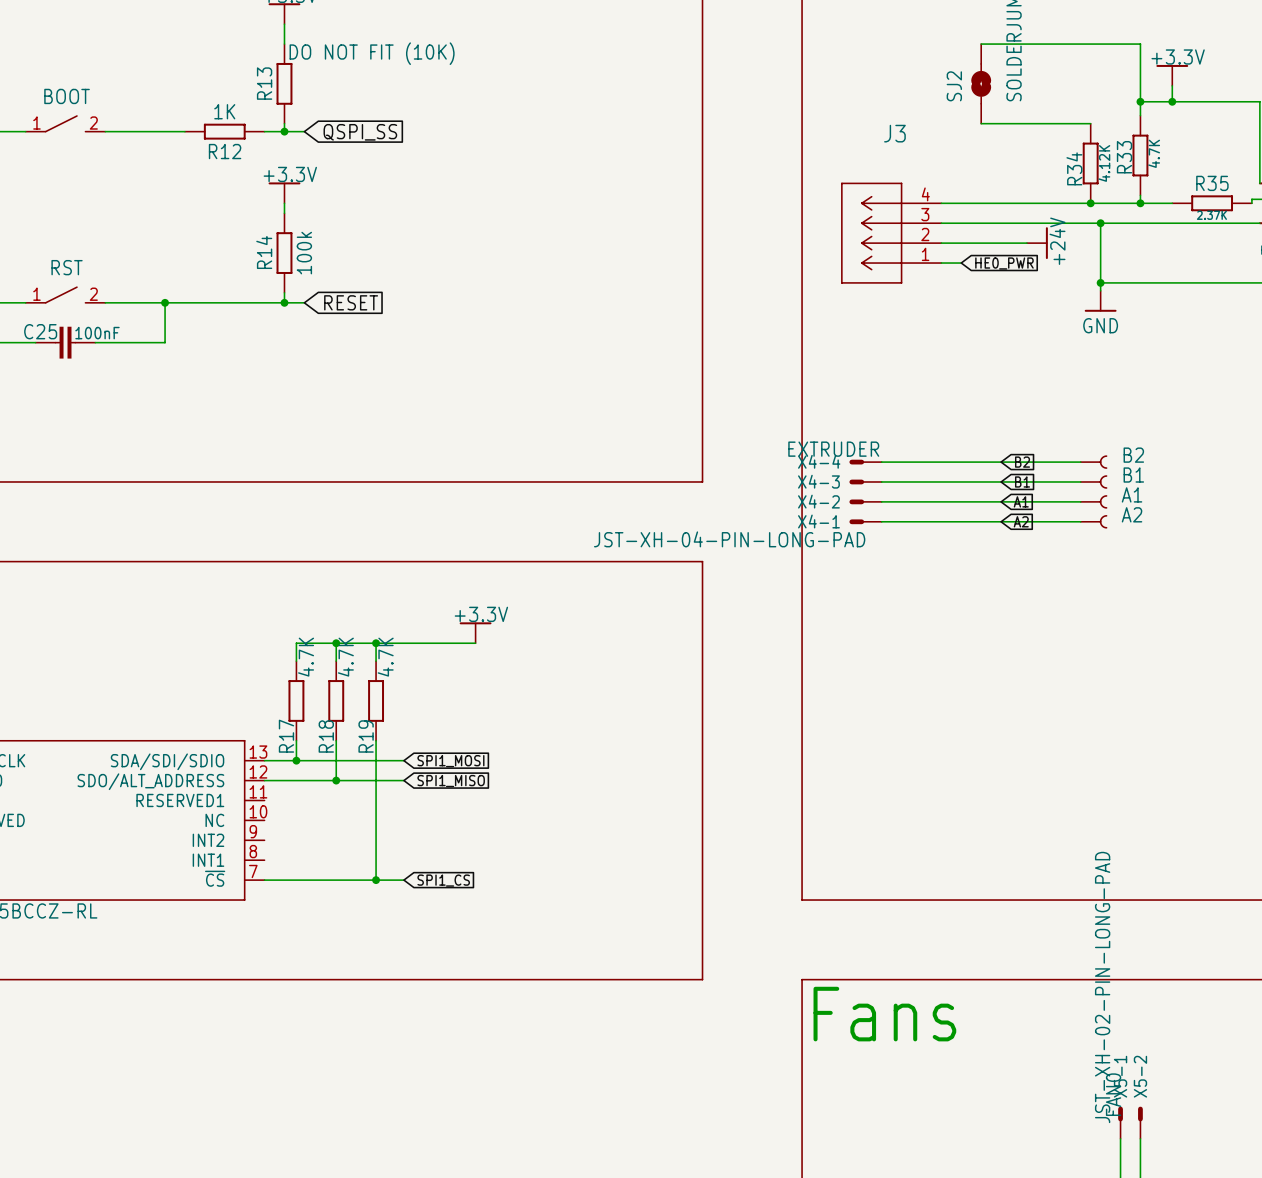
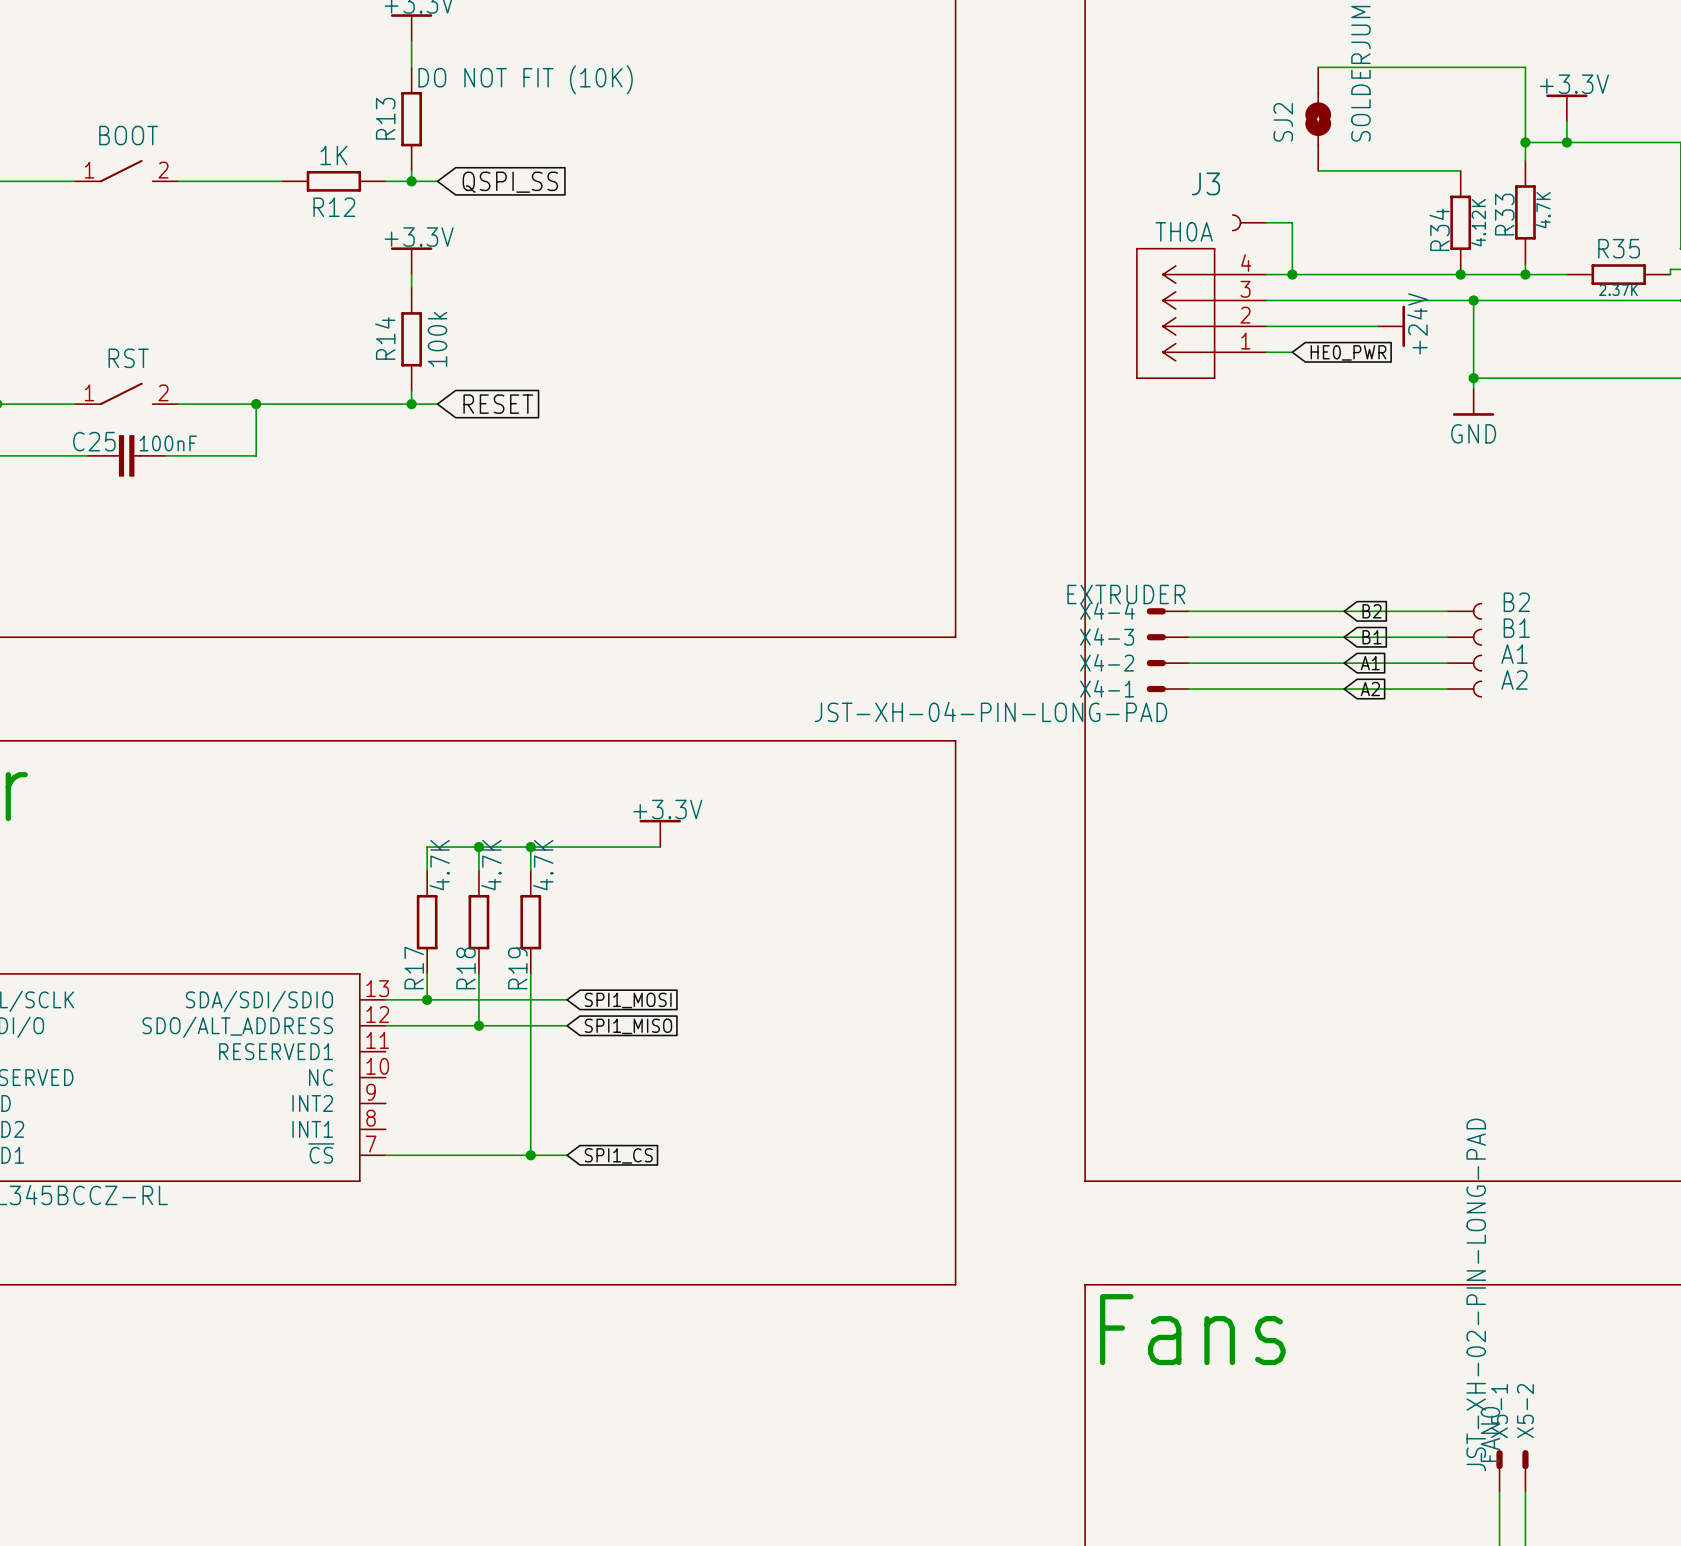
TH0A: none -> (1249, 222)
wire: none -> (1266, 222) (1292, 222) (1292, 274)
junction: none -> (1292, 274)

